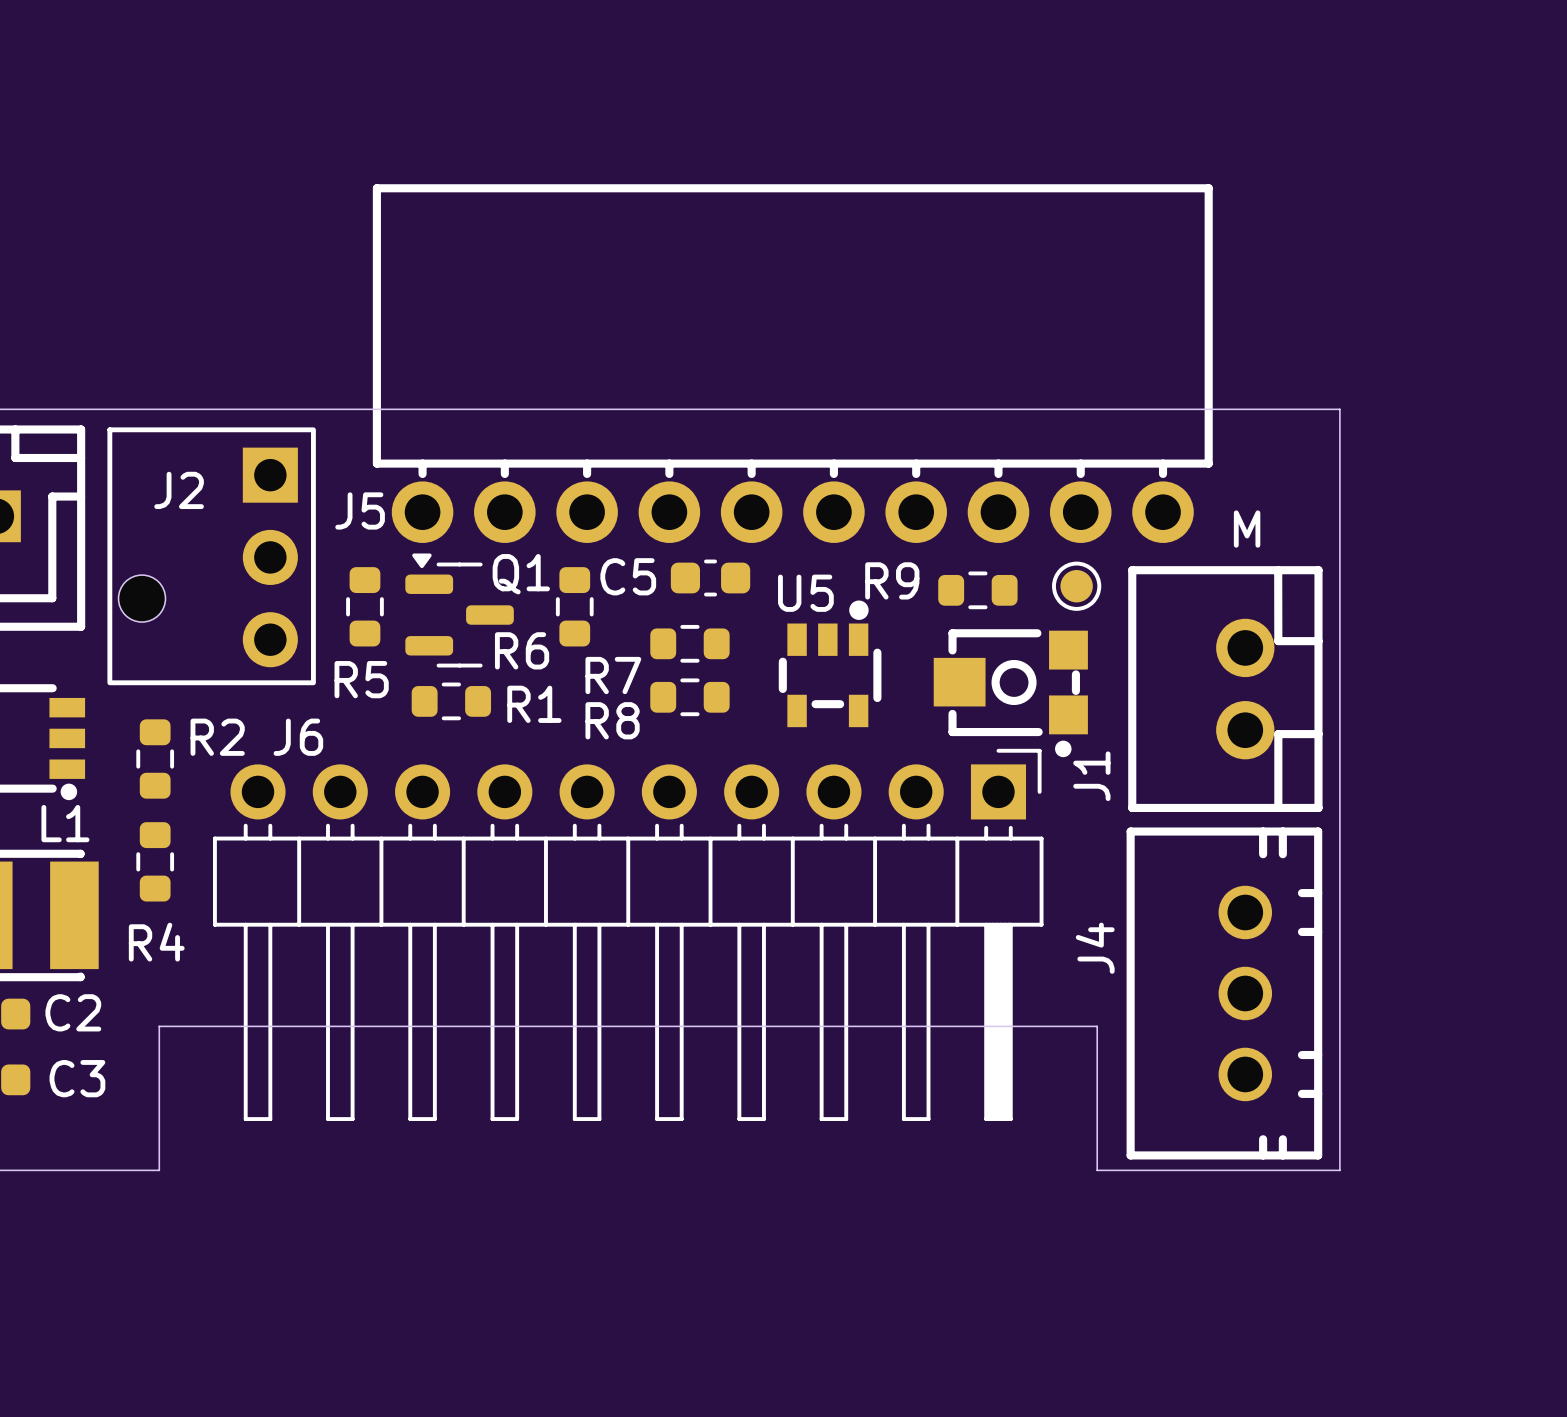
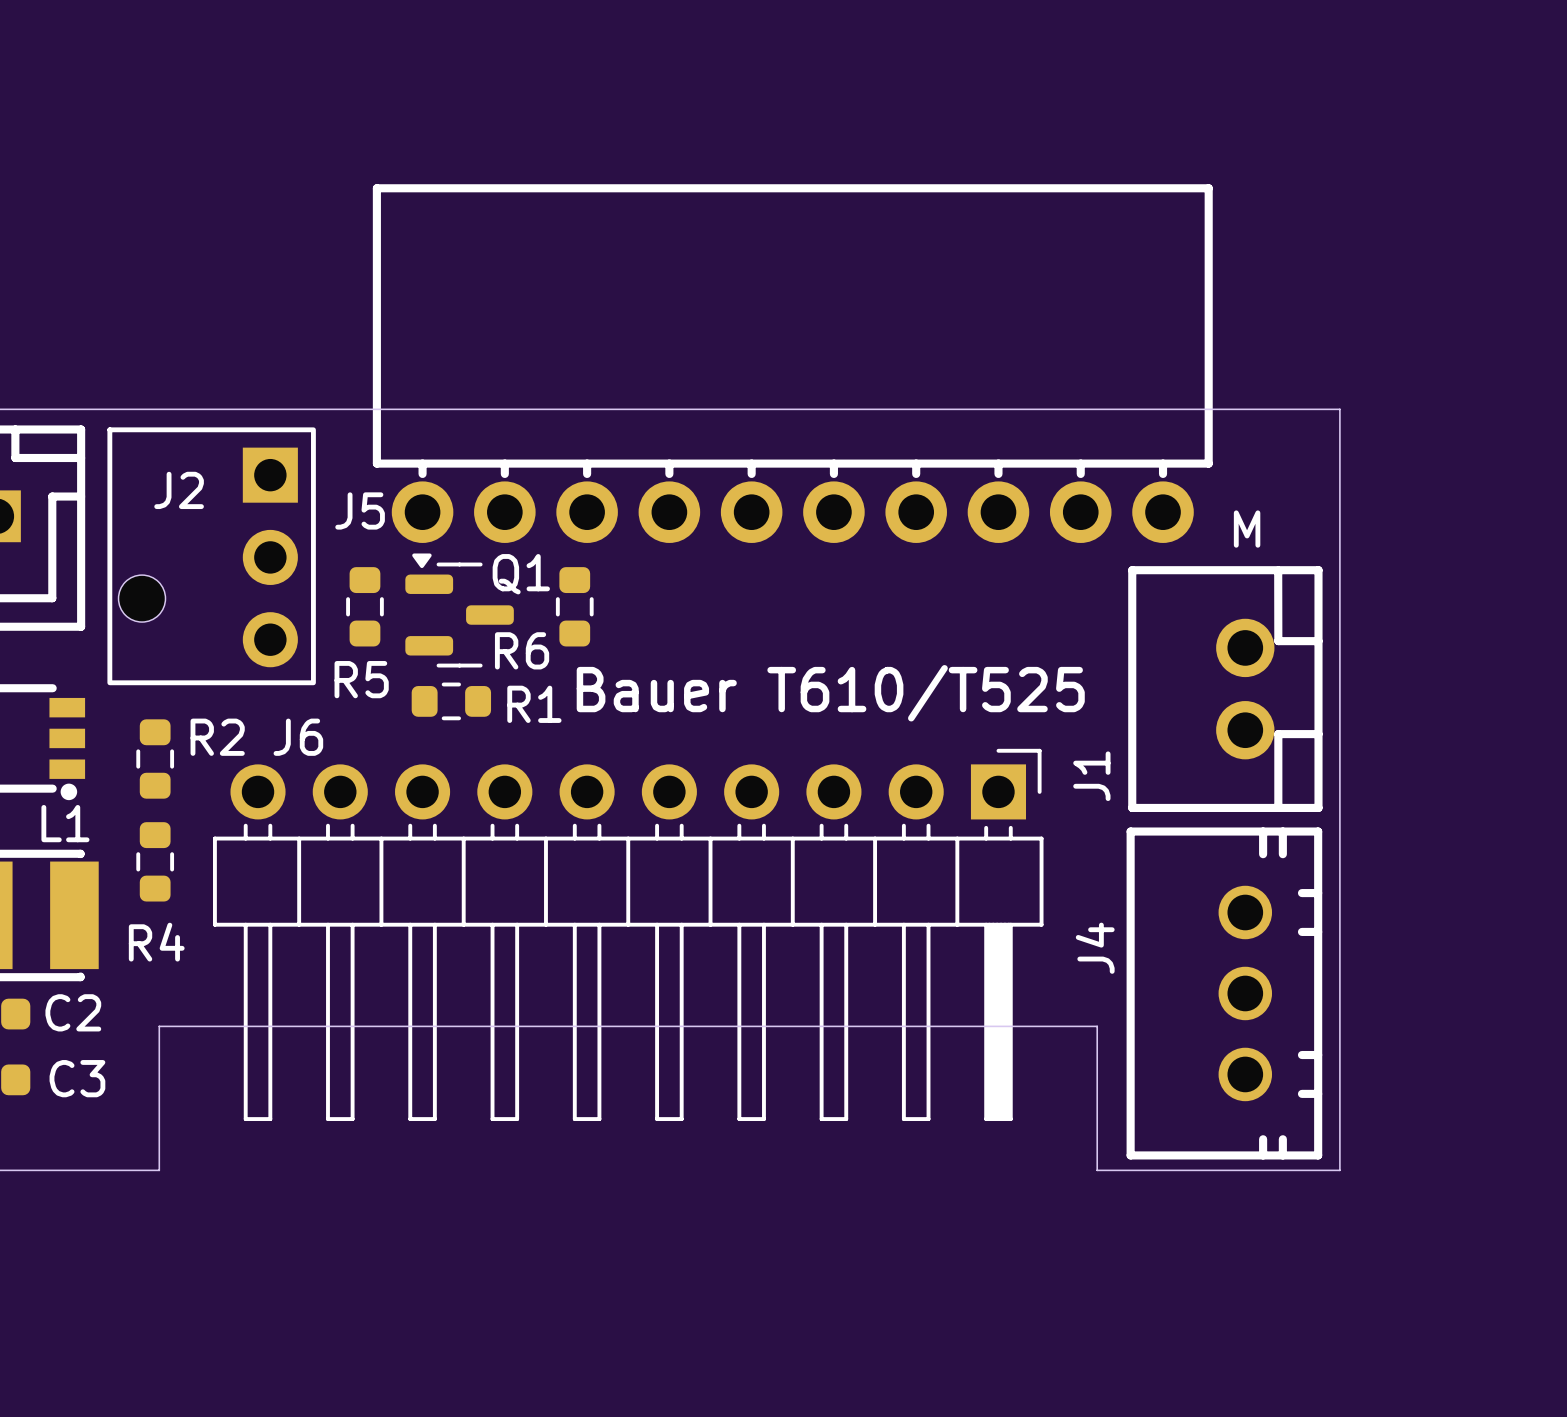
C5: (710, 578) -> none
part: (1076, 586) -> none
R9: (977, 590) -> none
R7: (689, 643) -> none
U5: (830, 663) -> none
text: none -> Bauer T610/T525 (830, 693)
part: (1010, 693) -> none
R8: (689, 697) -> none

